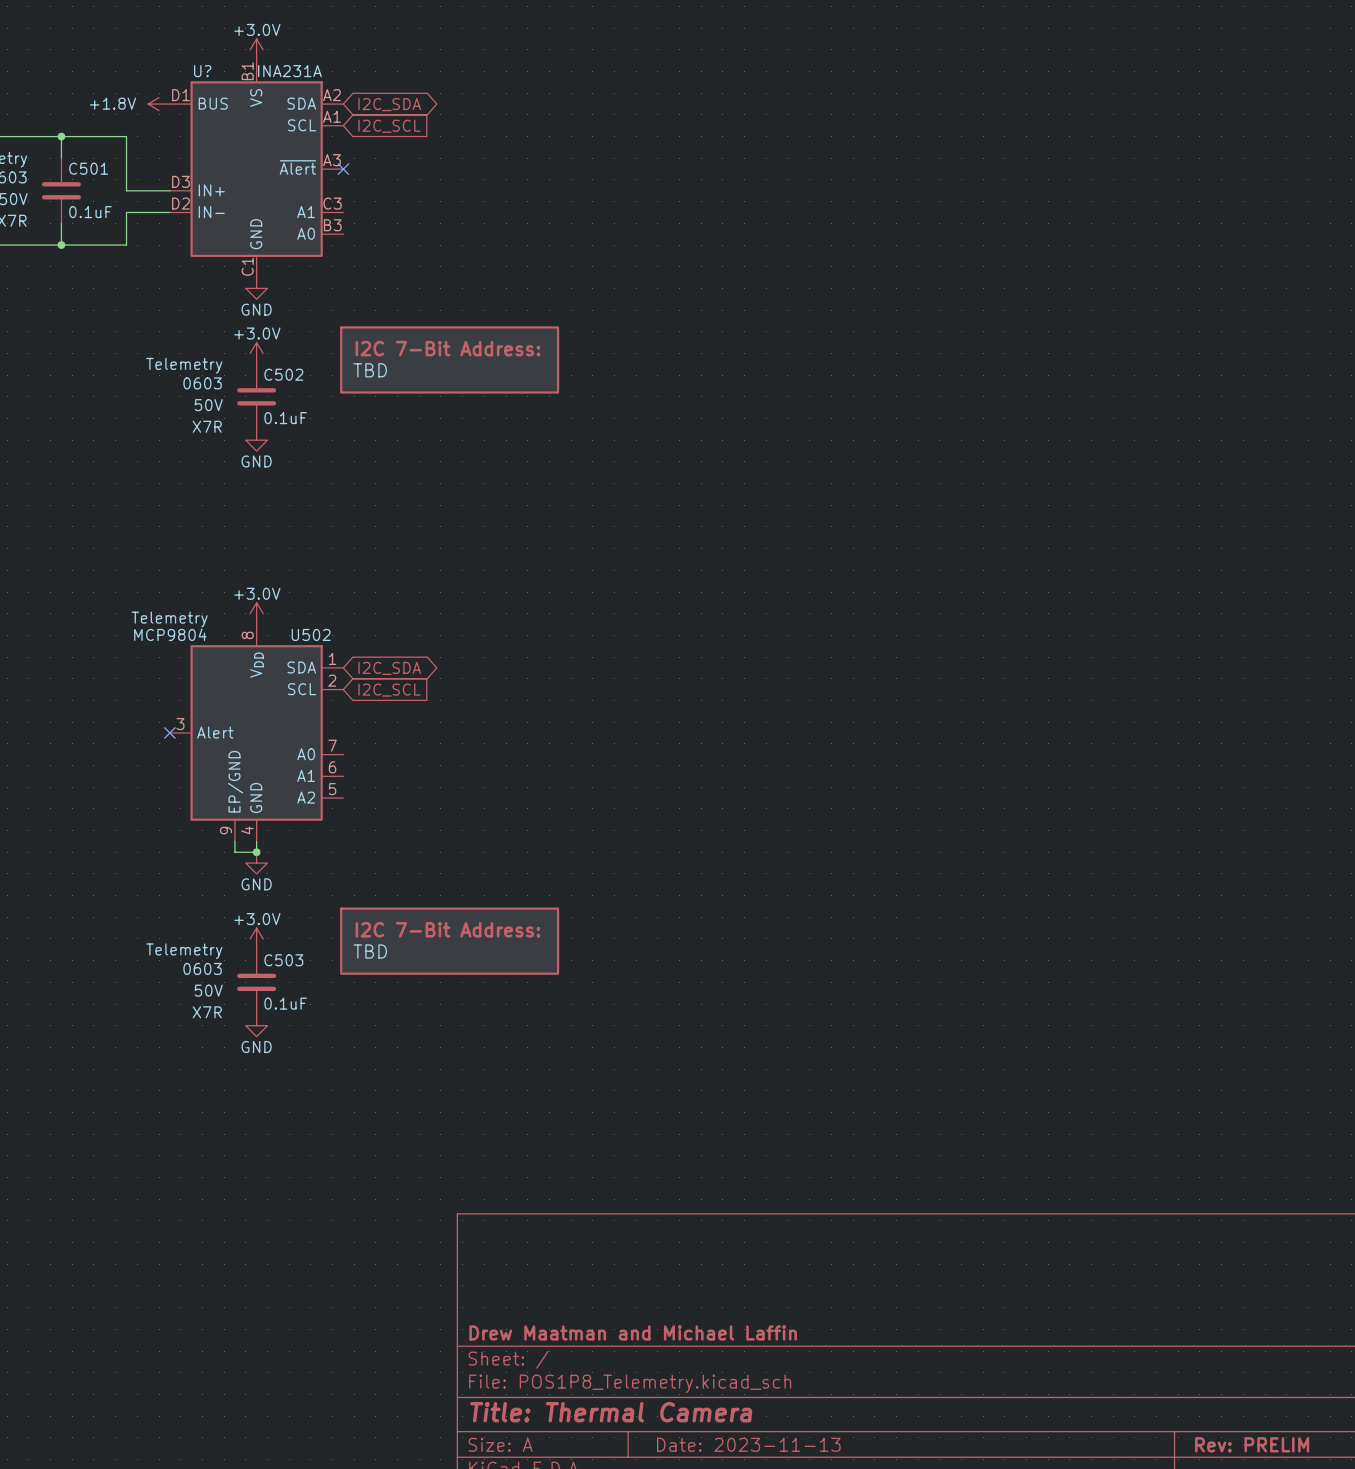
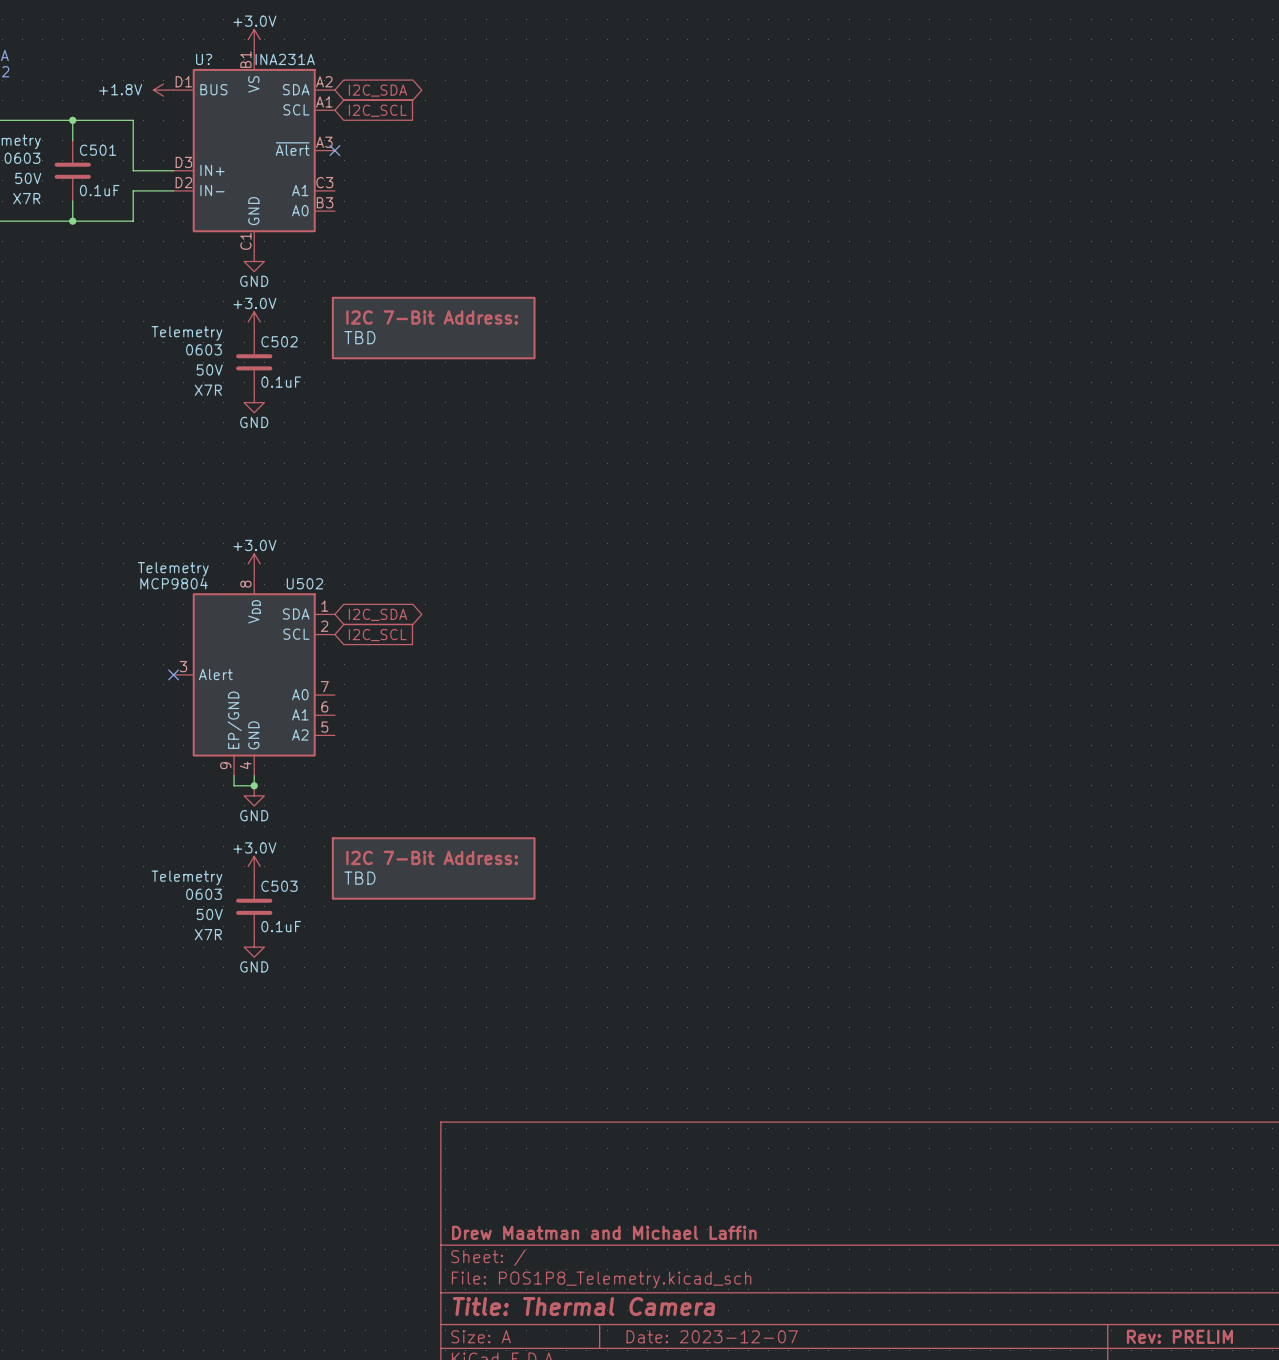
title block: Date: 2023-11-13 (748, 1444) -> Date: 2023-12-07 (712, 1336)

